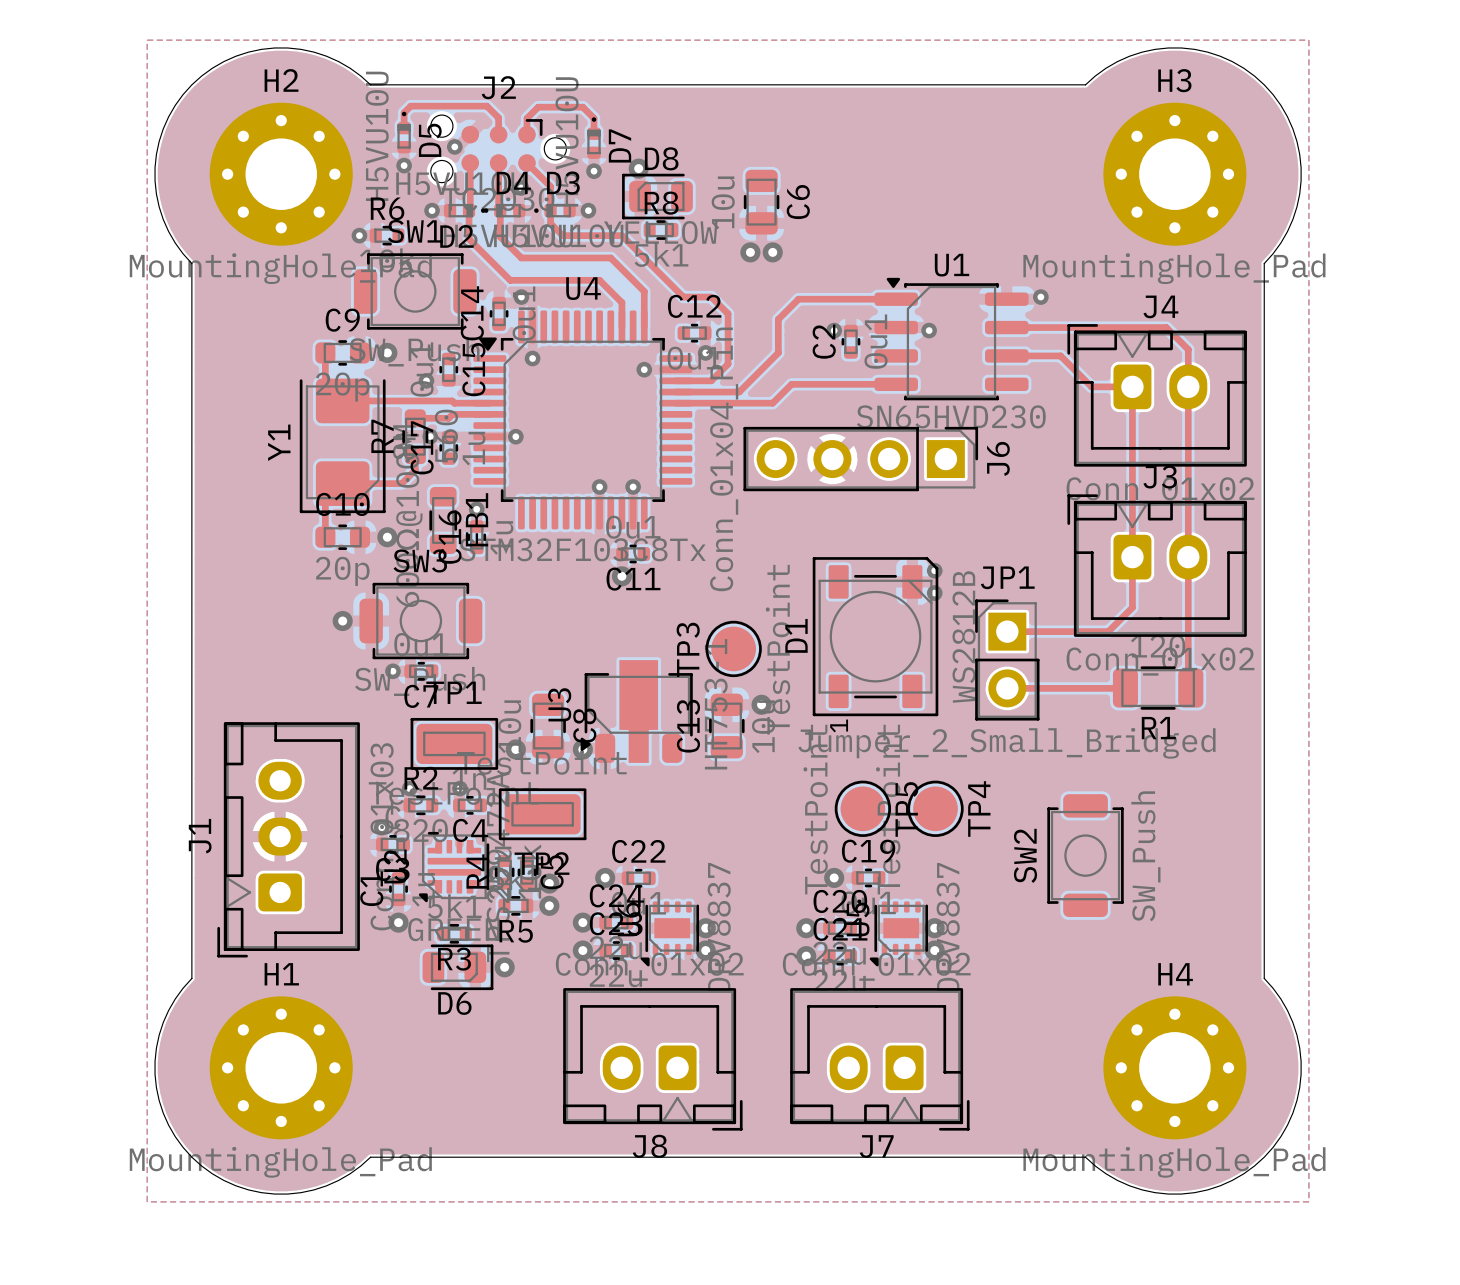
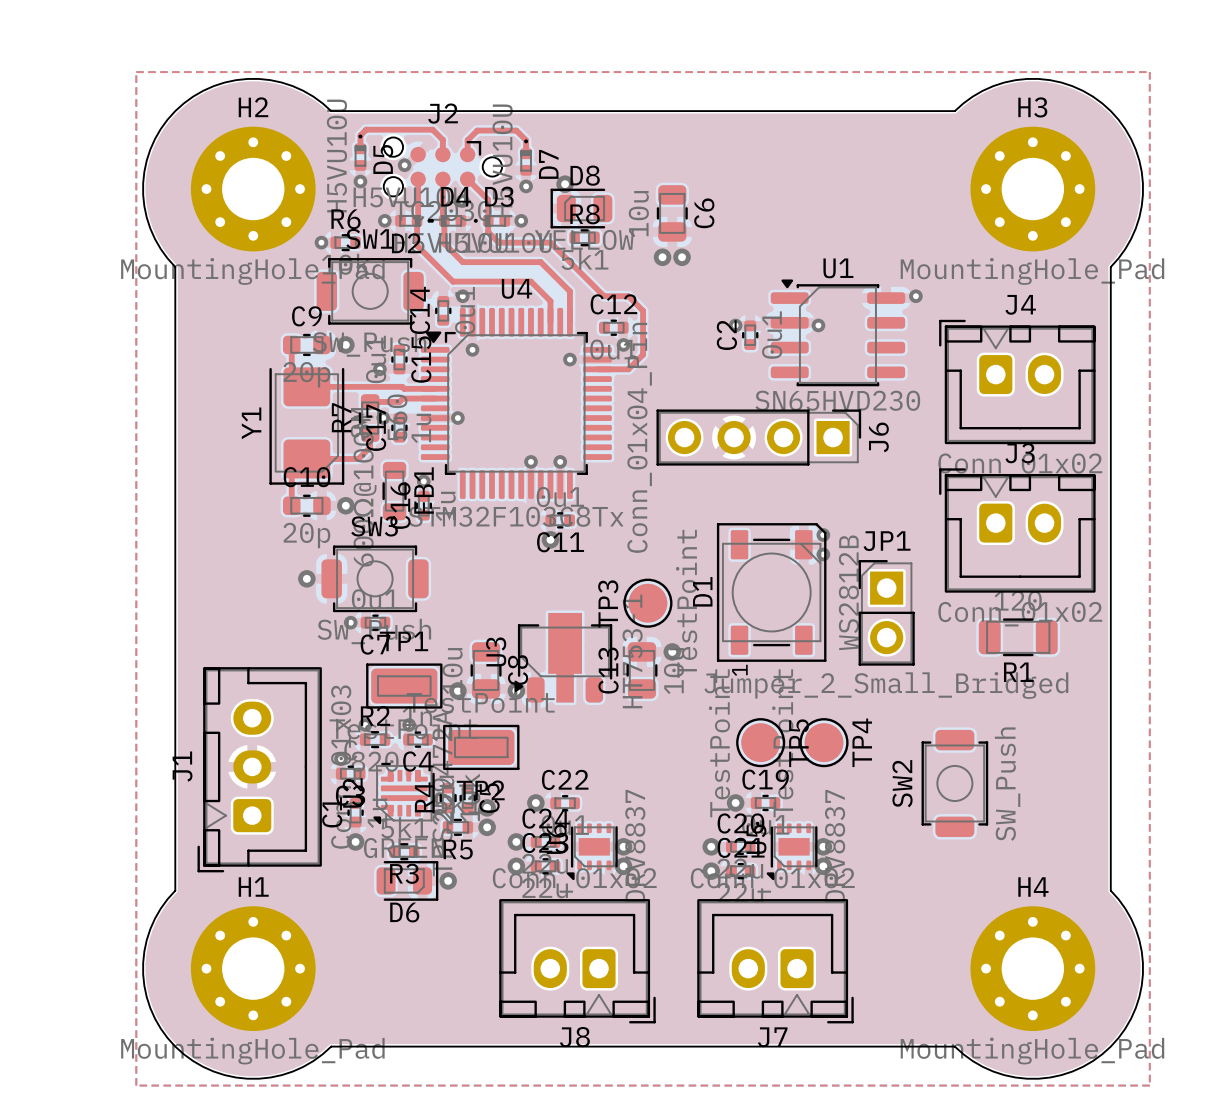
top track: (896, 299) (798, 299) (778, 319) (778, 352) (739, 392) (675, 392) -> none
top track: (1006, 327) (1166, 327) (1188, 349) (1188, 685) (1190, 688) -> none
top track: (1006, 355) (1060, 355) (1091, 386) (1132, 386) (1132, 607) (1108, 631) (1007, 631) -> none
top track: (896, 384) (791, 384) (772, 403) (675, 403) -> none
top track: (1125, 688) (1007, 688) -> none

